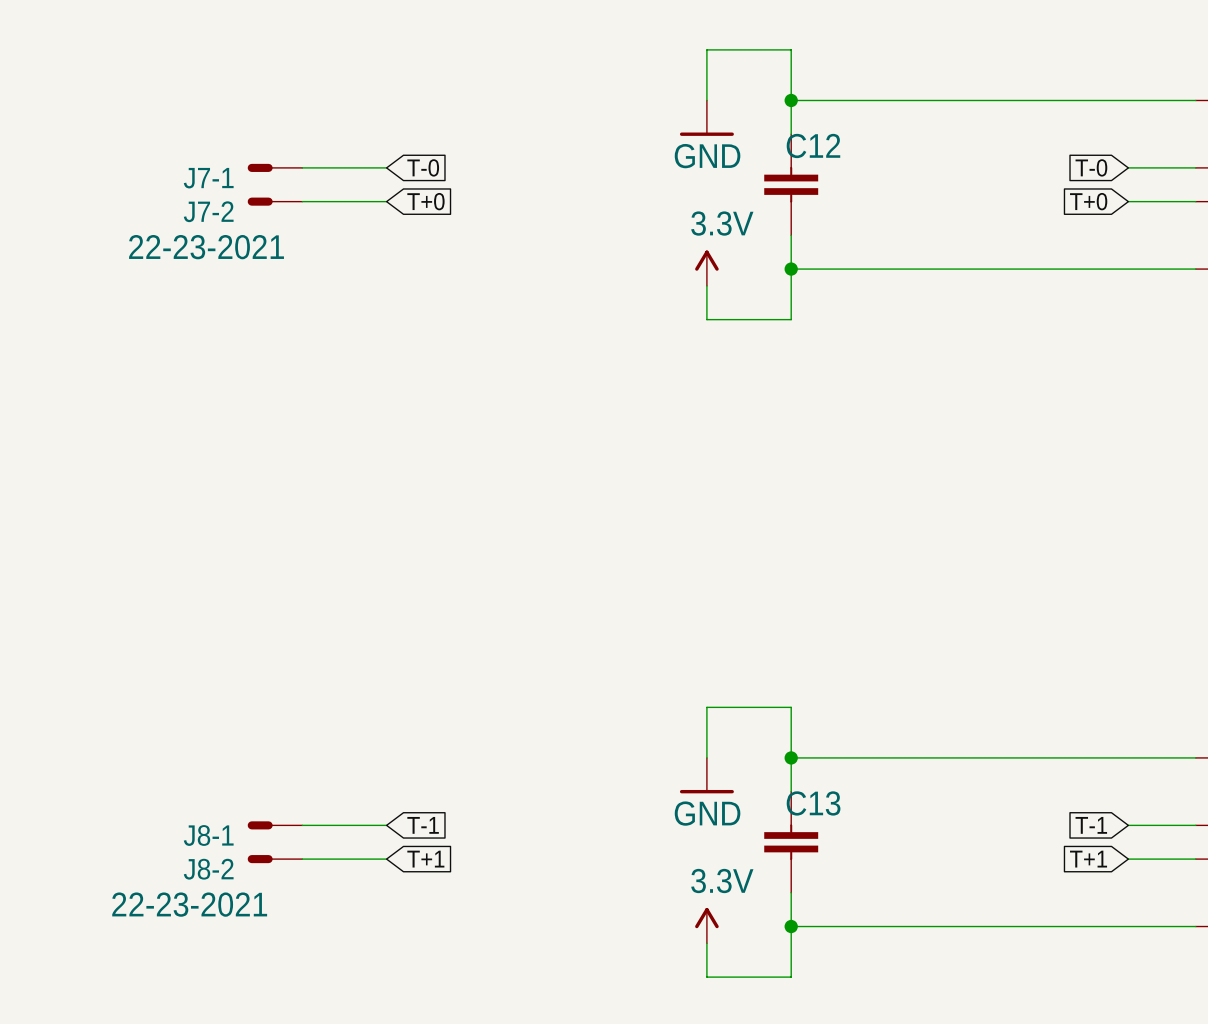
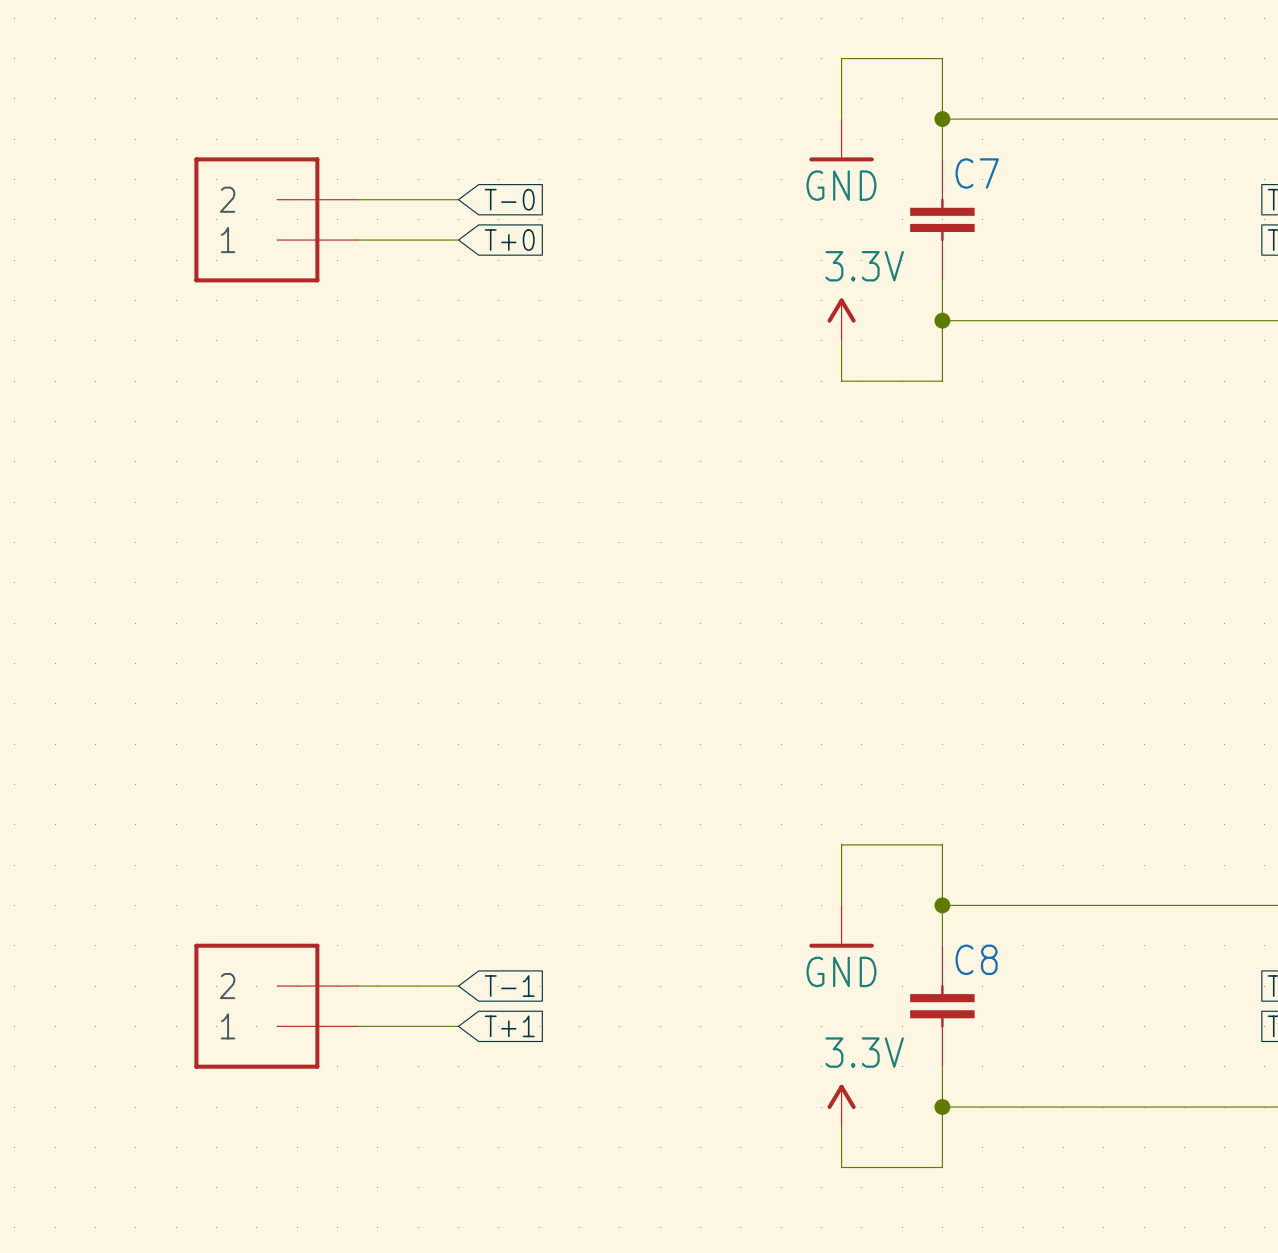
C12 name: C12 (813, 145) -> C7 (977, 173)
J7-1: 22-23-2021 (275, 167) -> none
part: none -> (276, 219)
J7-2: (275, 201) -> none
C13 name: C13 (813, 803) -> C8 (976, 959)
J8-1: 22-23-2021 (275, 825) -> none
part: none -> (276, 1006)
J8-2: (275, 859) -> none

